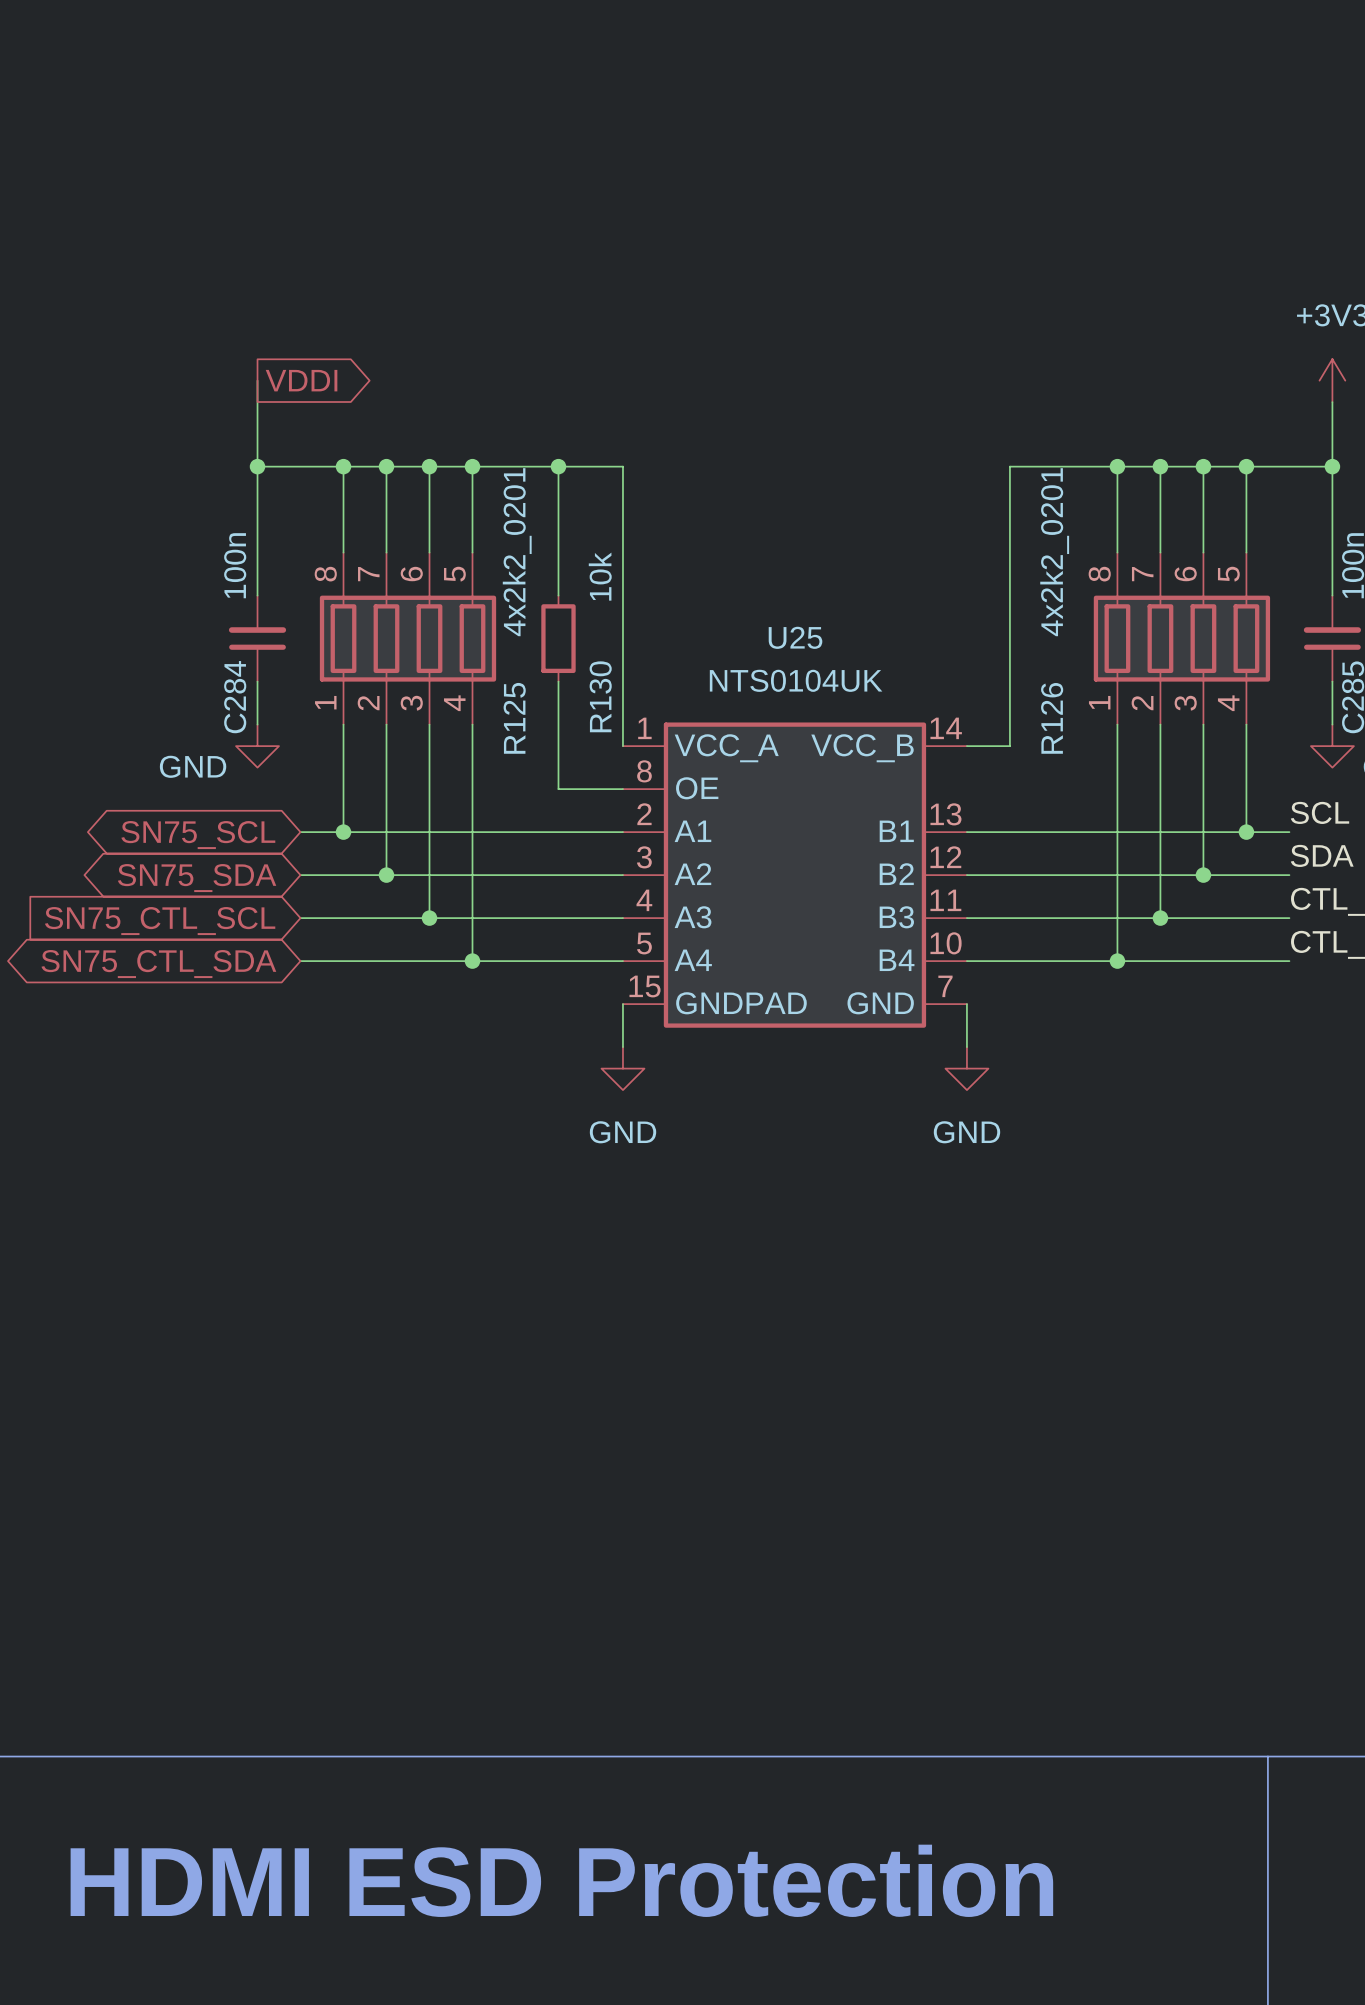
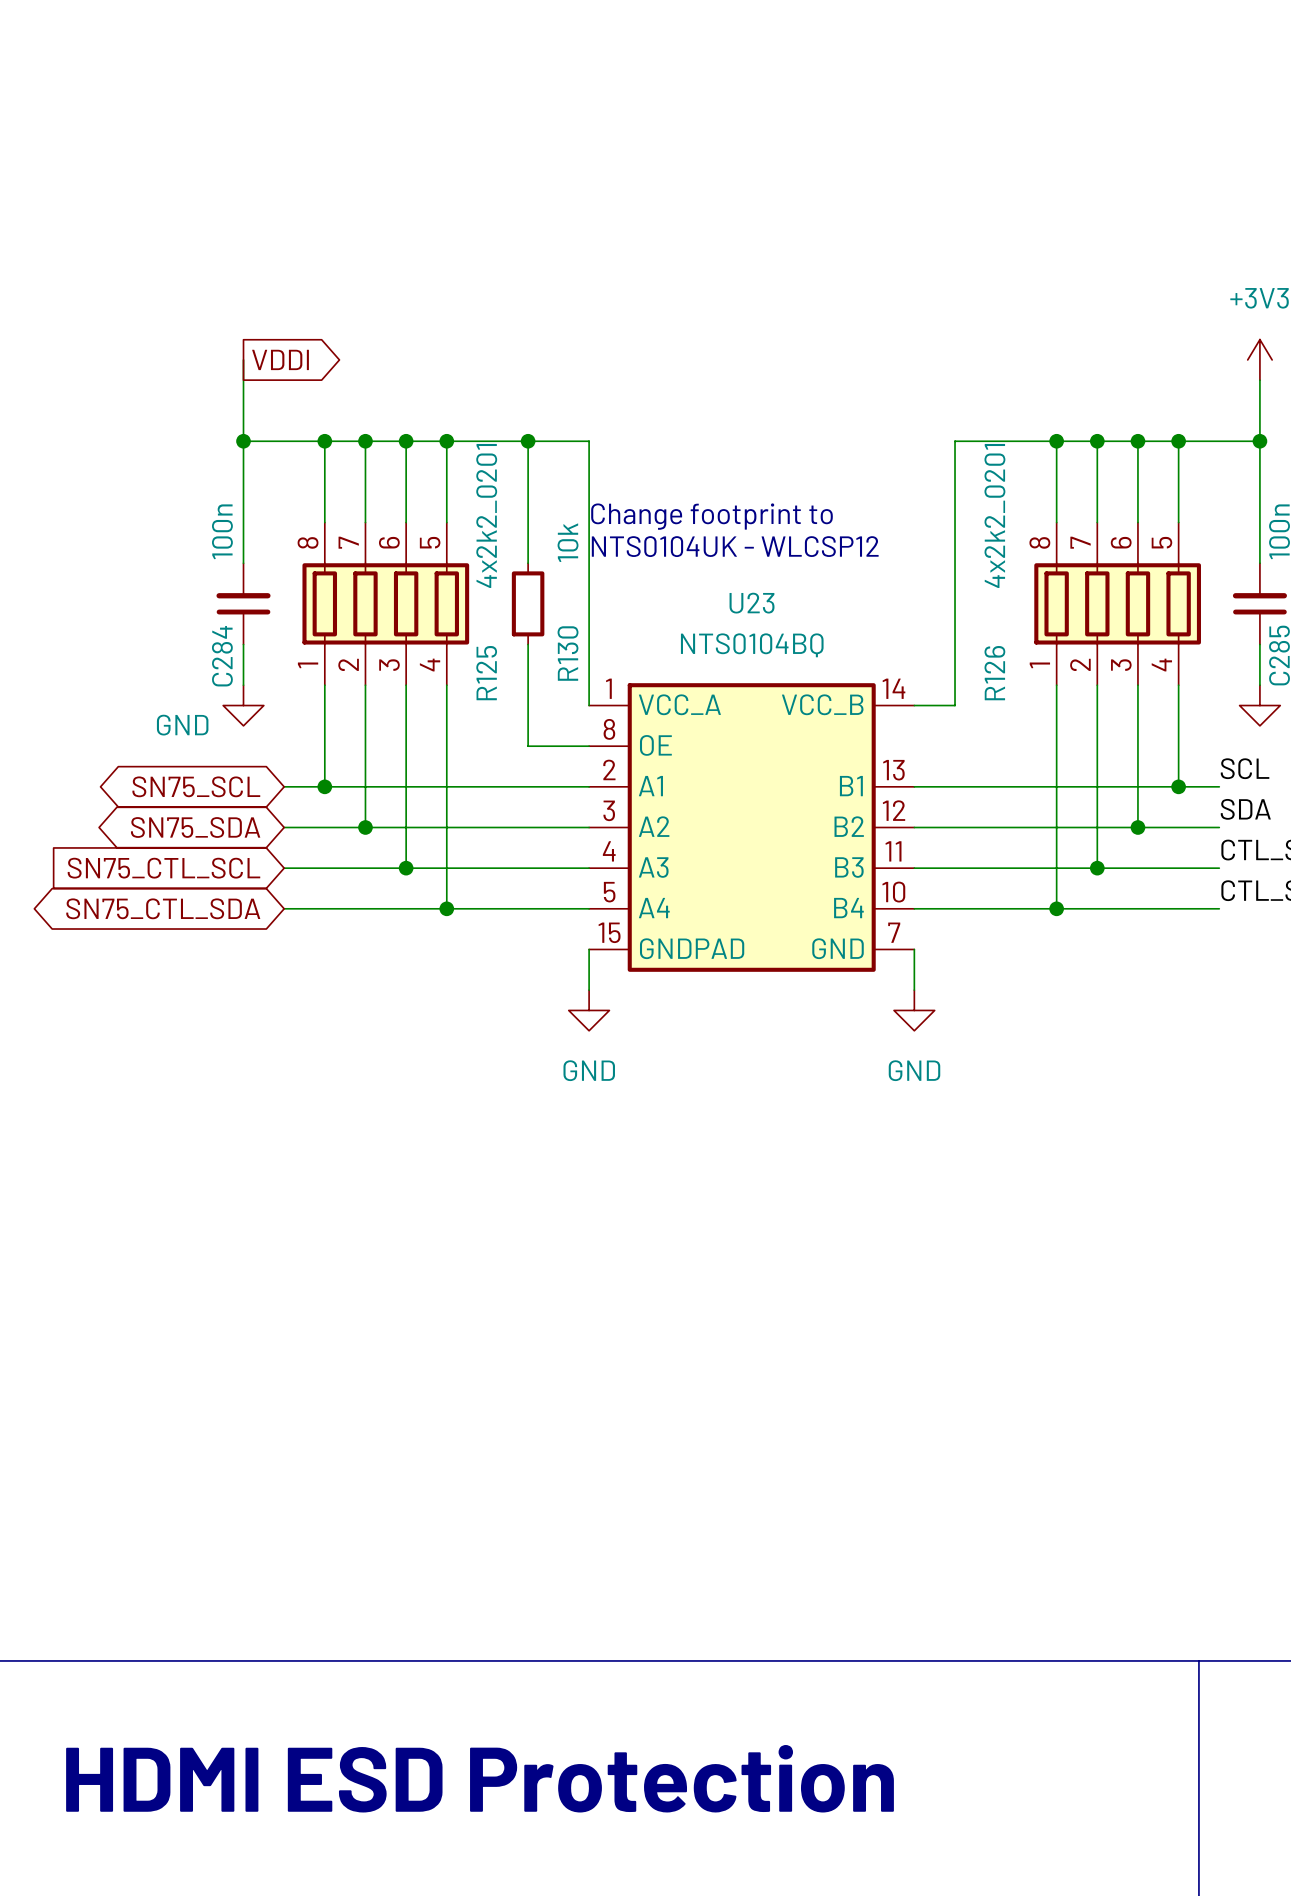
text: none -> Change footprint to (712, 516)
text: none -> NTS0104UK - WLCSP12 (735, 546)
U25 name: U25 (795, 637) -> U23 (752, 603)
U25 text: NTS0104UK (796, 680) -> NTS0104BQ (752, 645)

